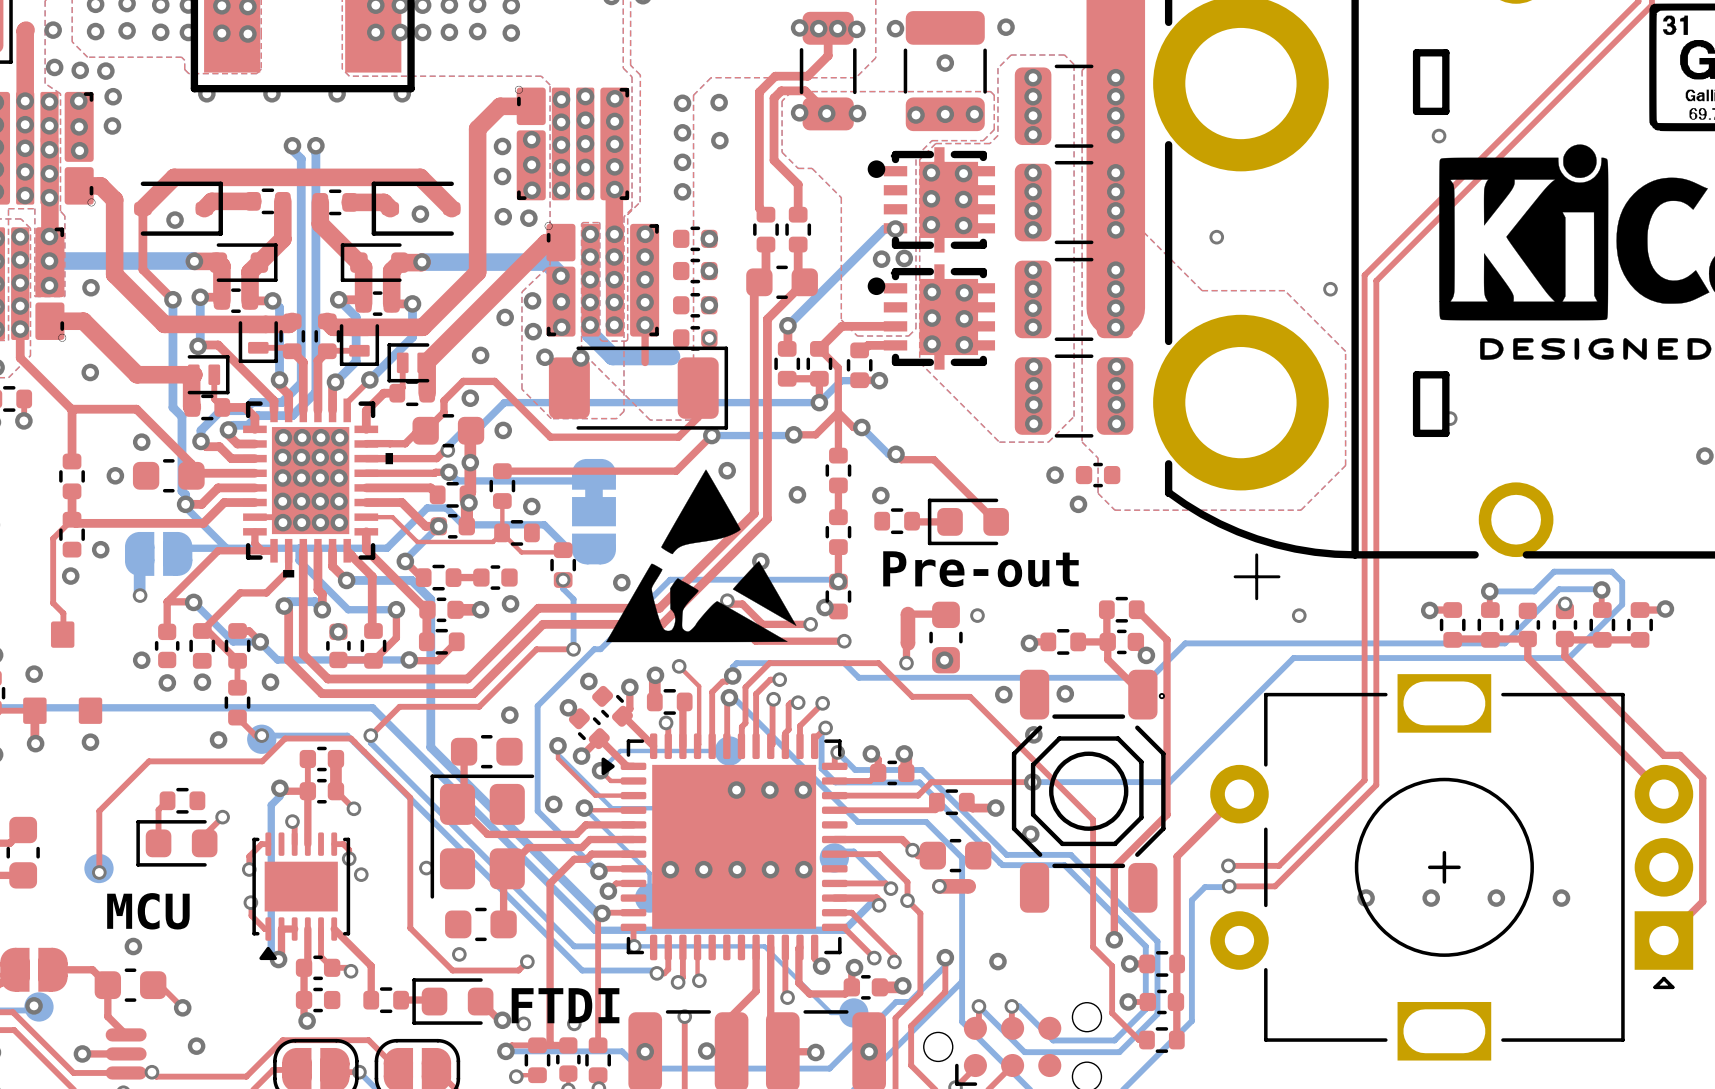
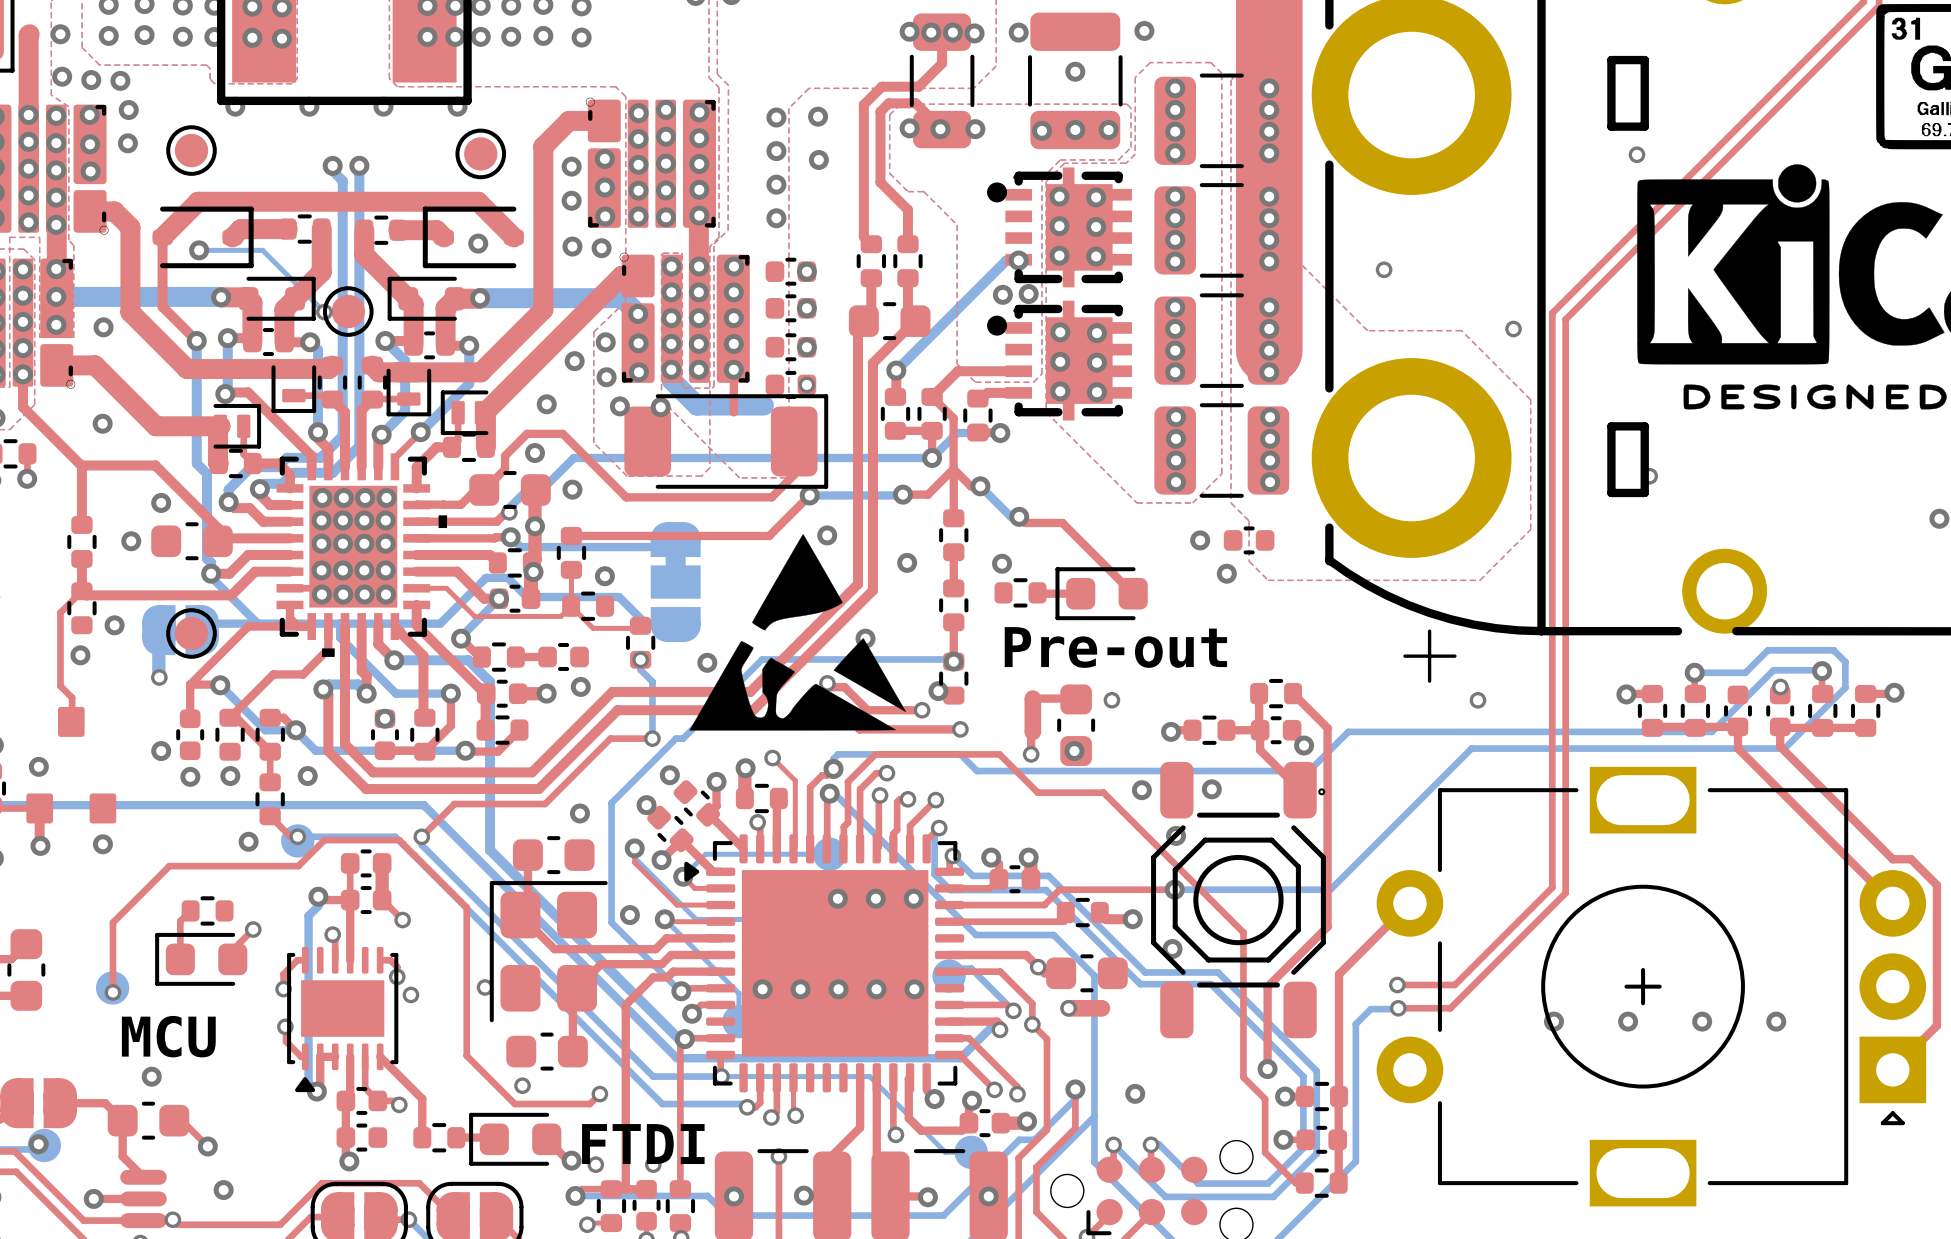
part: none -> (191, 150)
part: none -> (480, 153)
bottom track: none -> (199, 250) (262, 250) (324, 312)
part: none -> (348, 311)
via: none -> (324, 312)
part: none -> (191, 633)

